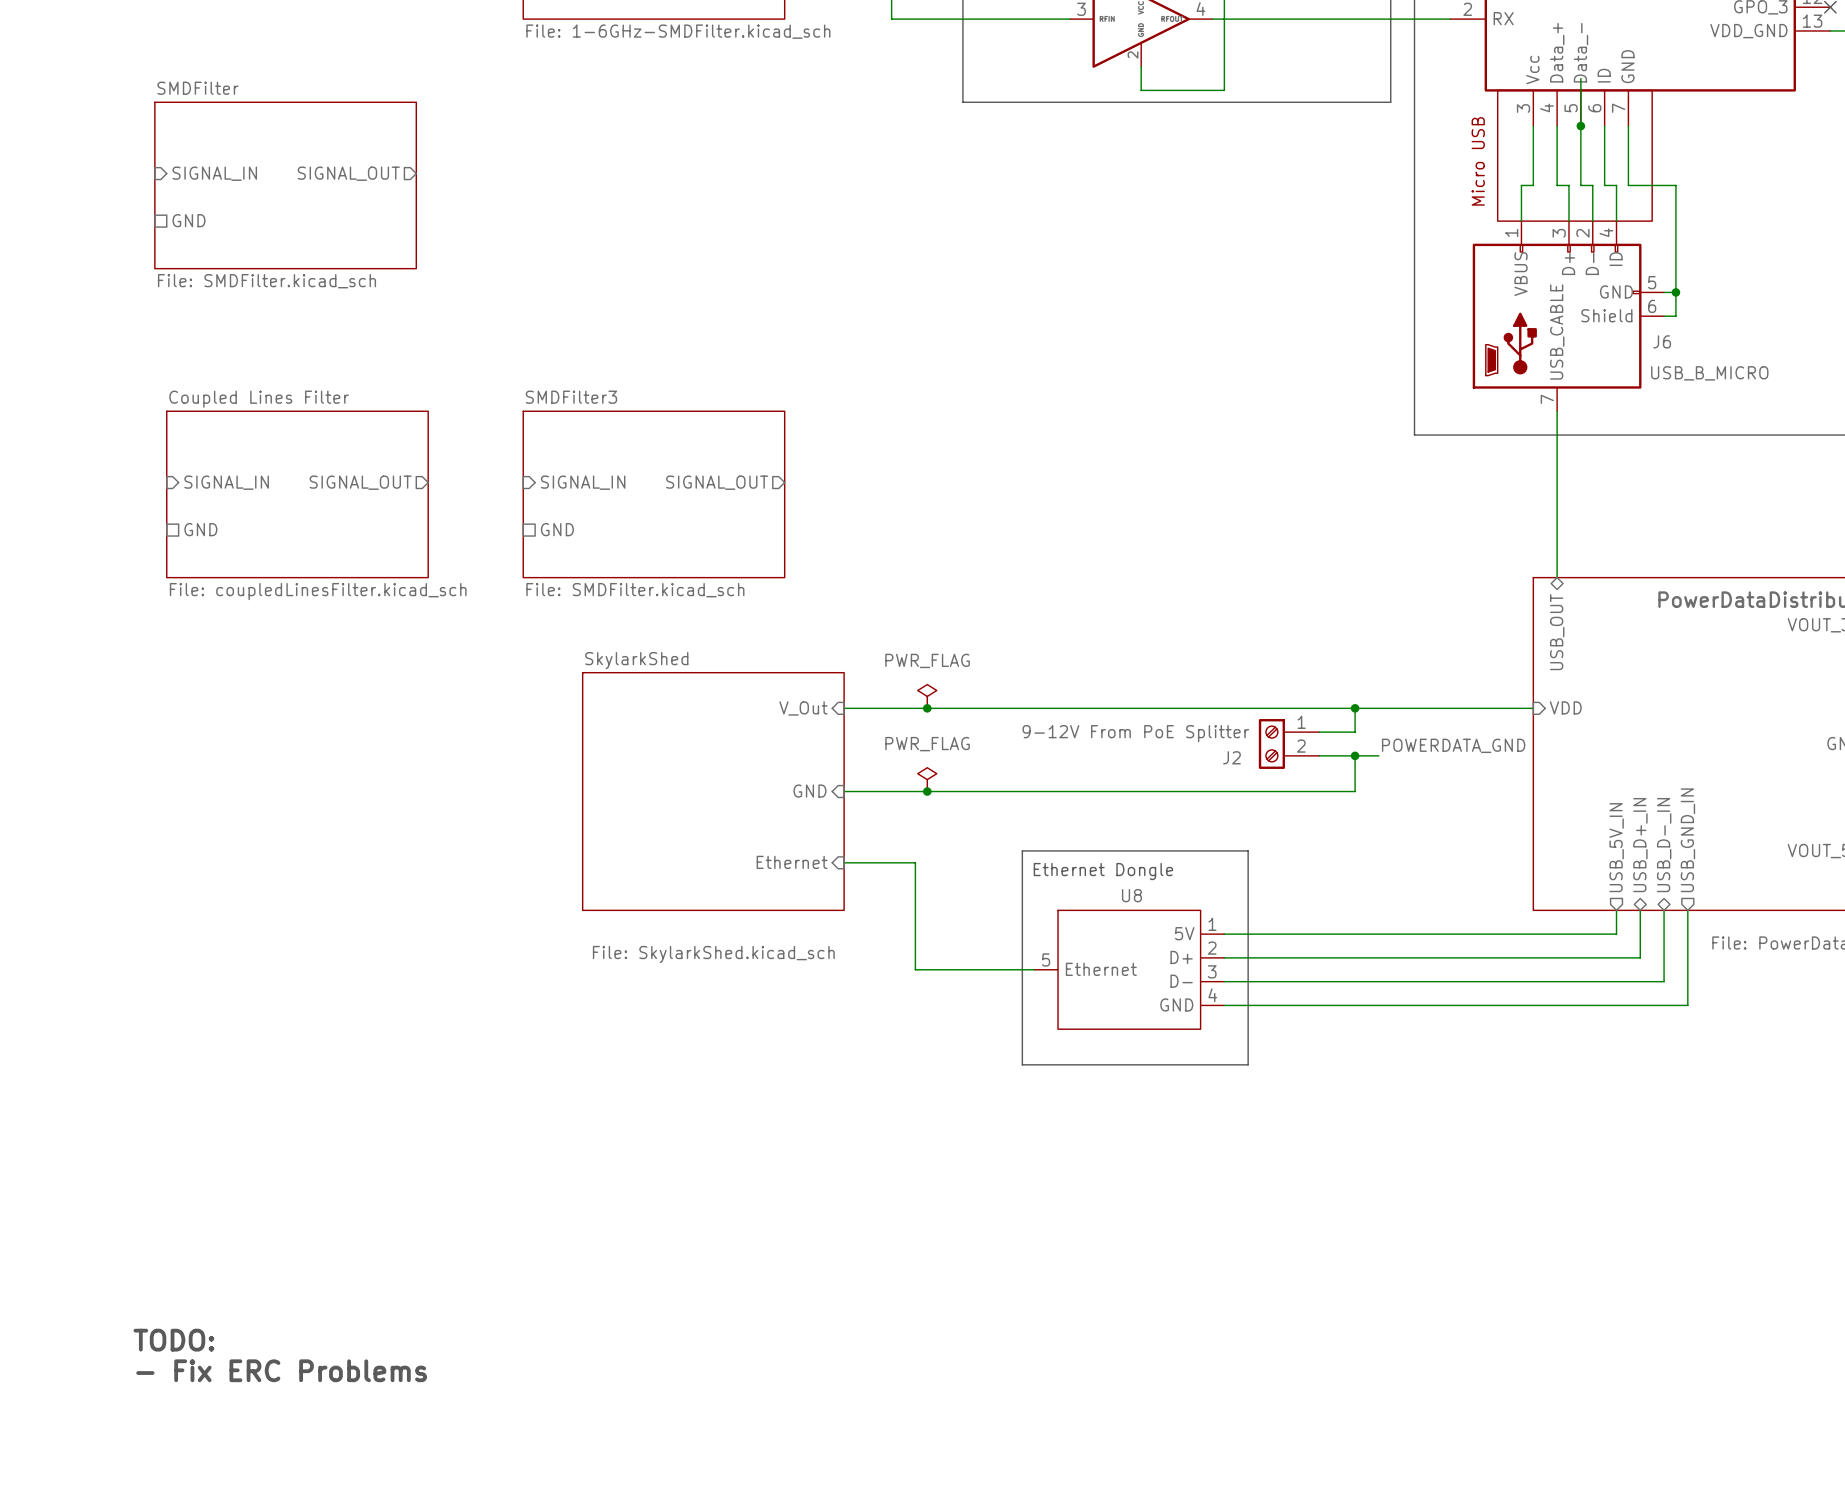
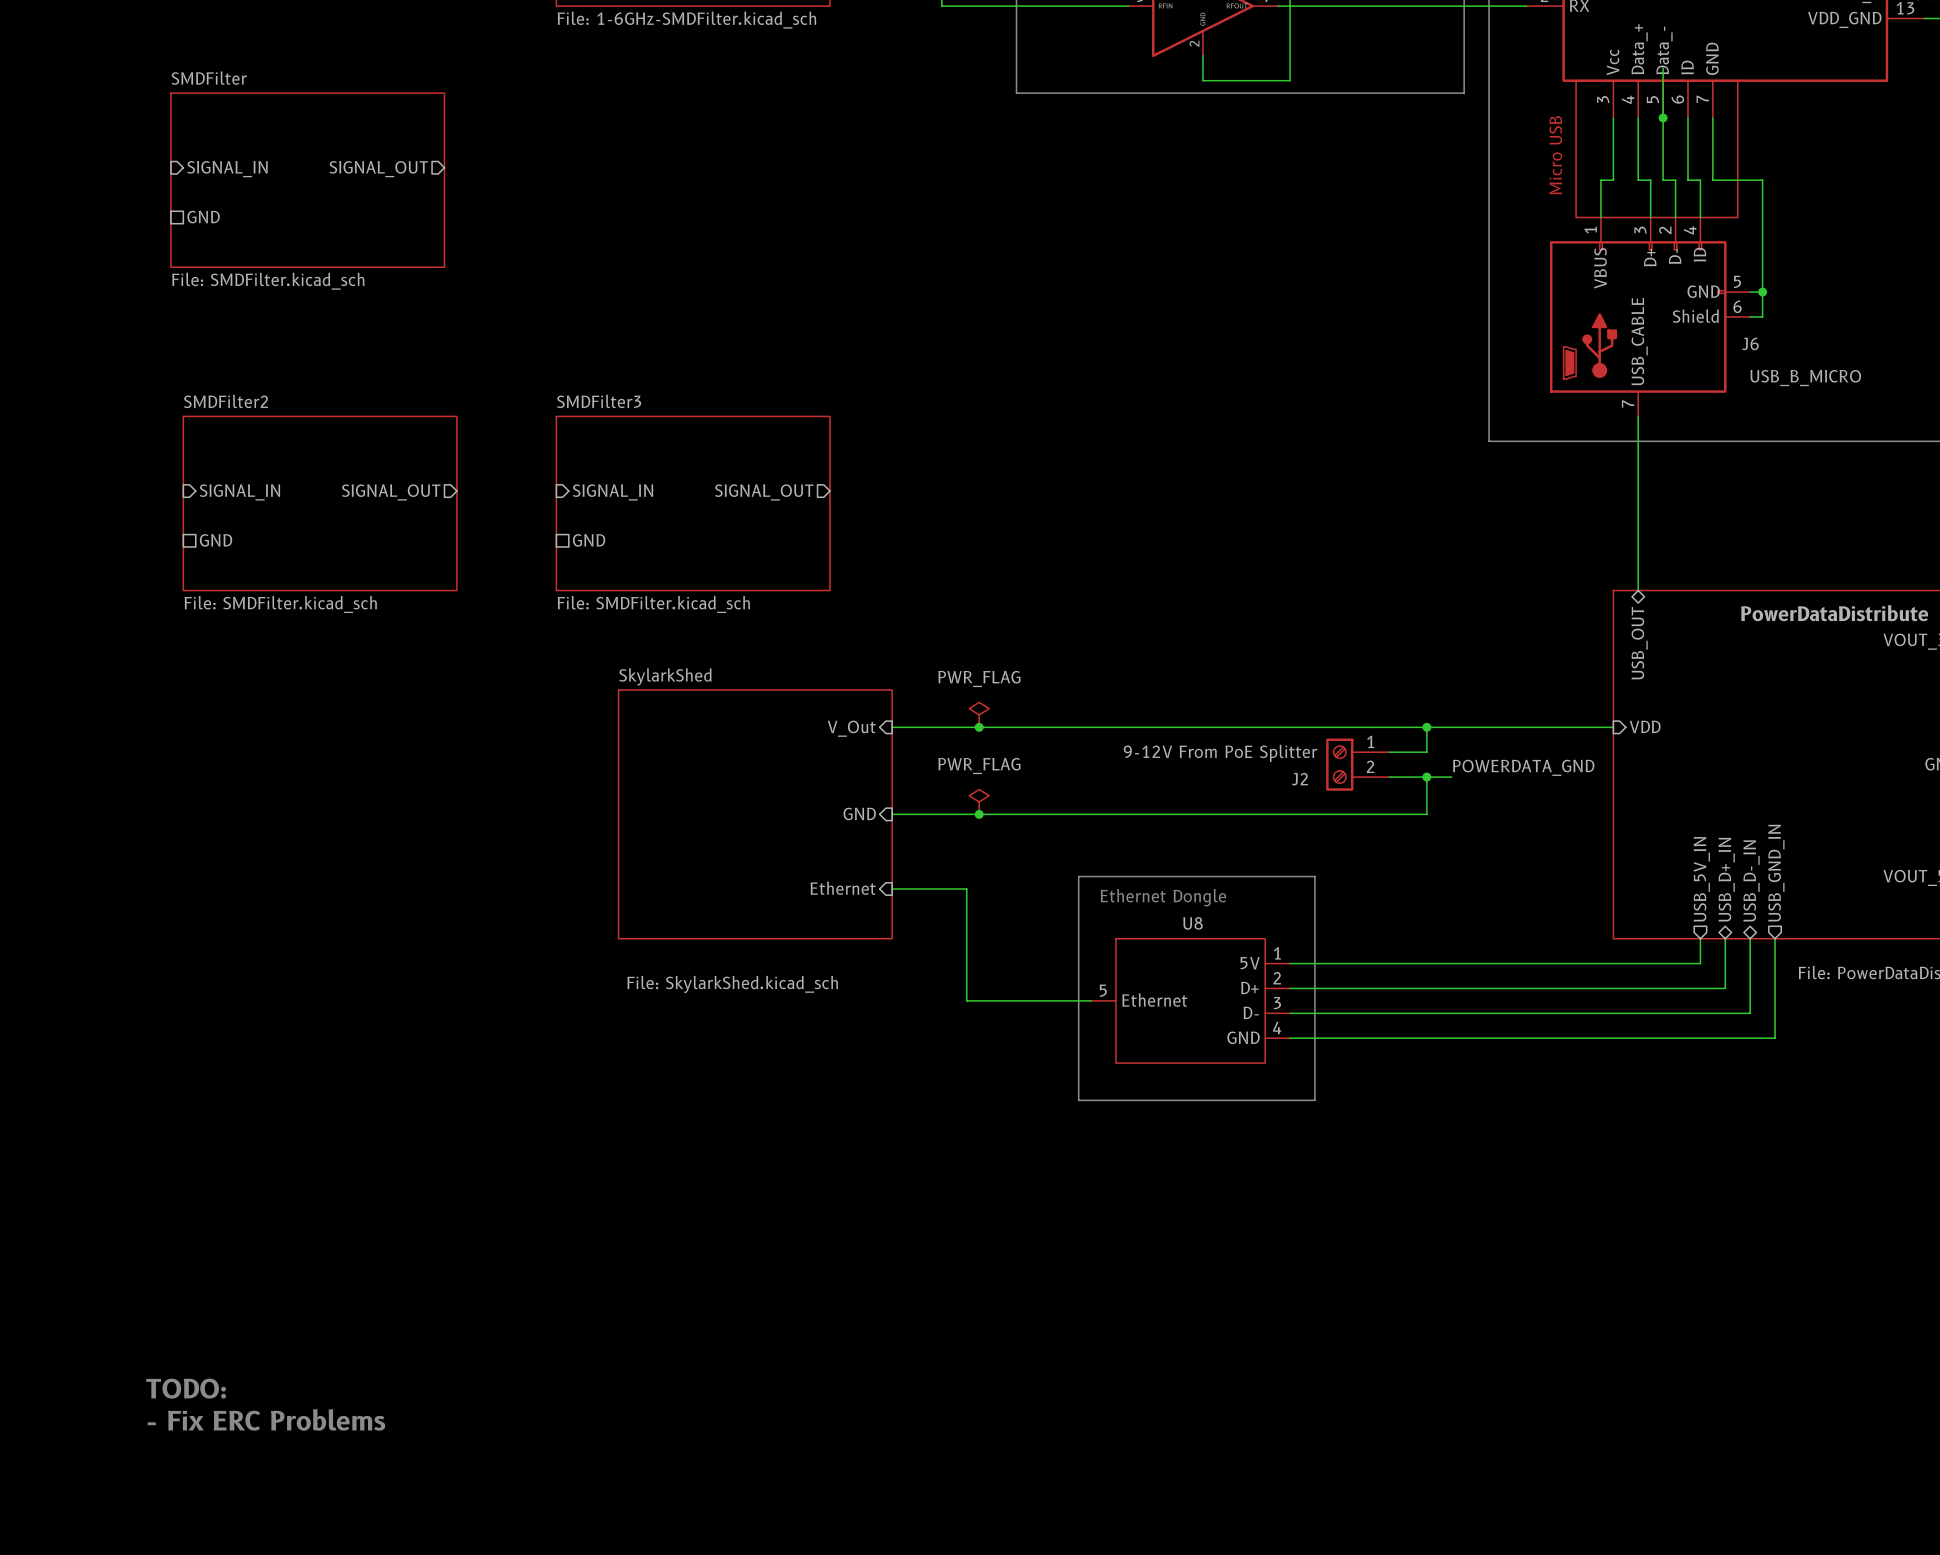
sheet Coupled Lines Filter name: Coupled Lines Filter (259, 399) -> SMDFilter2 (226, 401)
sheet Coupled Lines Filter value: File: coupledLinesFilter.kicad_sch (318, 591) -> File: SMDFilter.kicad_sch (280, 604)

